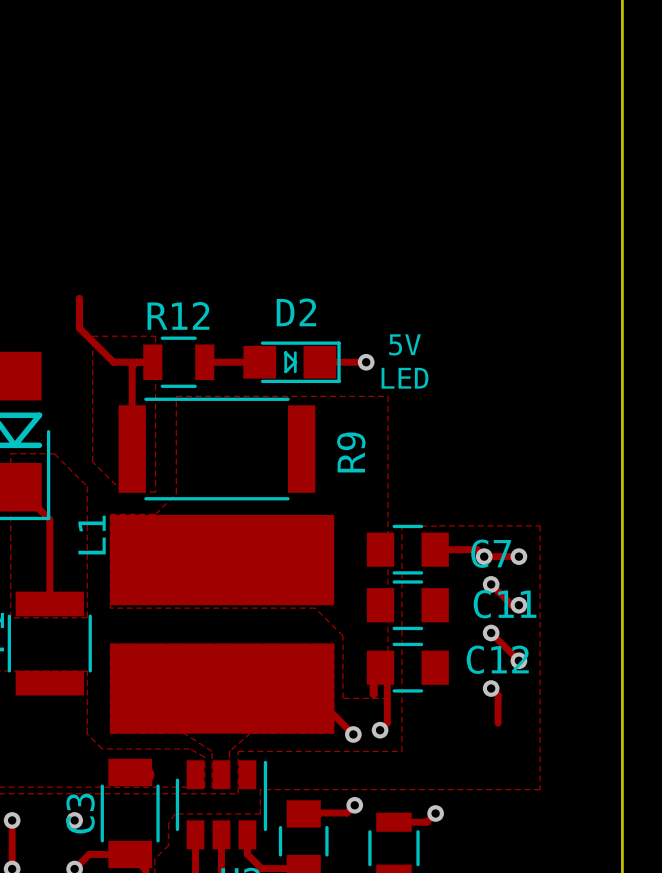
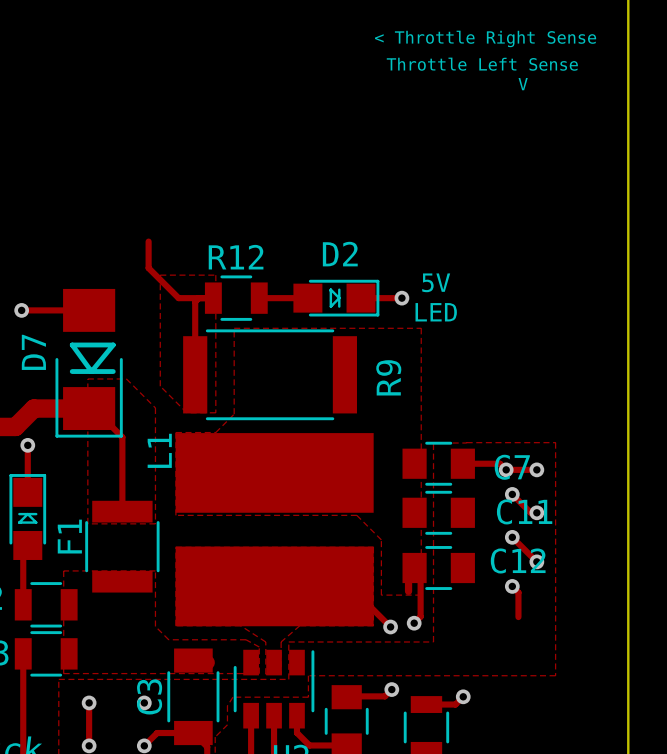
text: none -> < Throttle Right Sense (485, 38)
text: none -> Throttle Left Sense (482, 64)
text: none -> V (523, 84)

